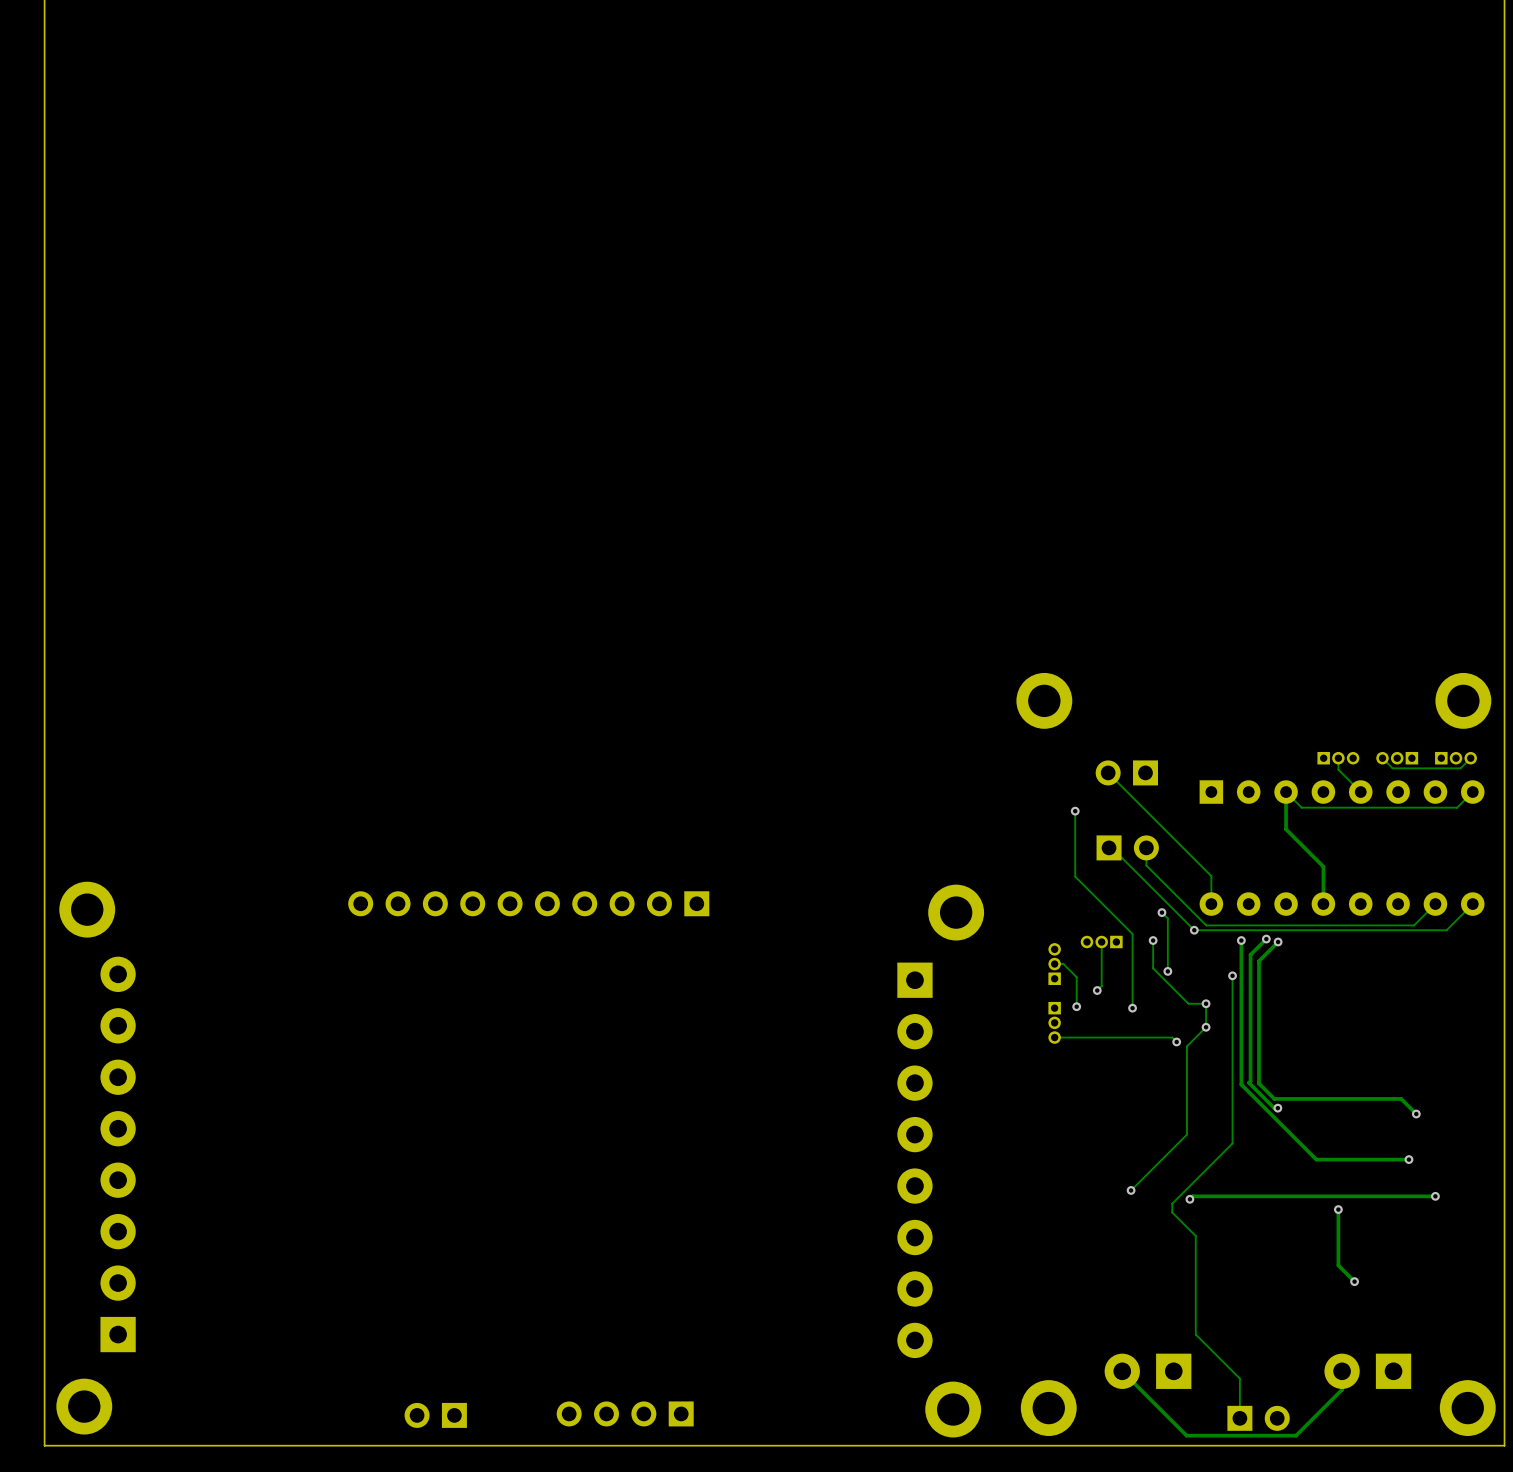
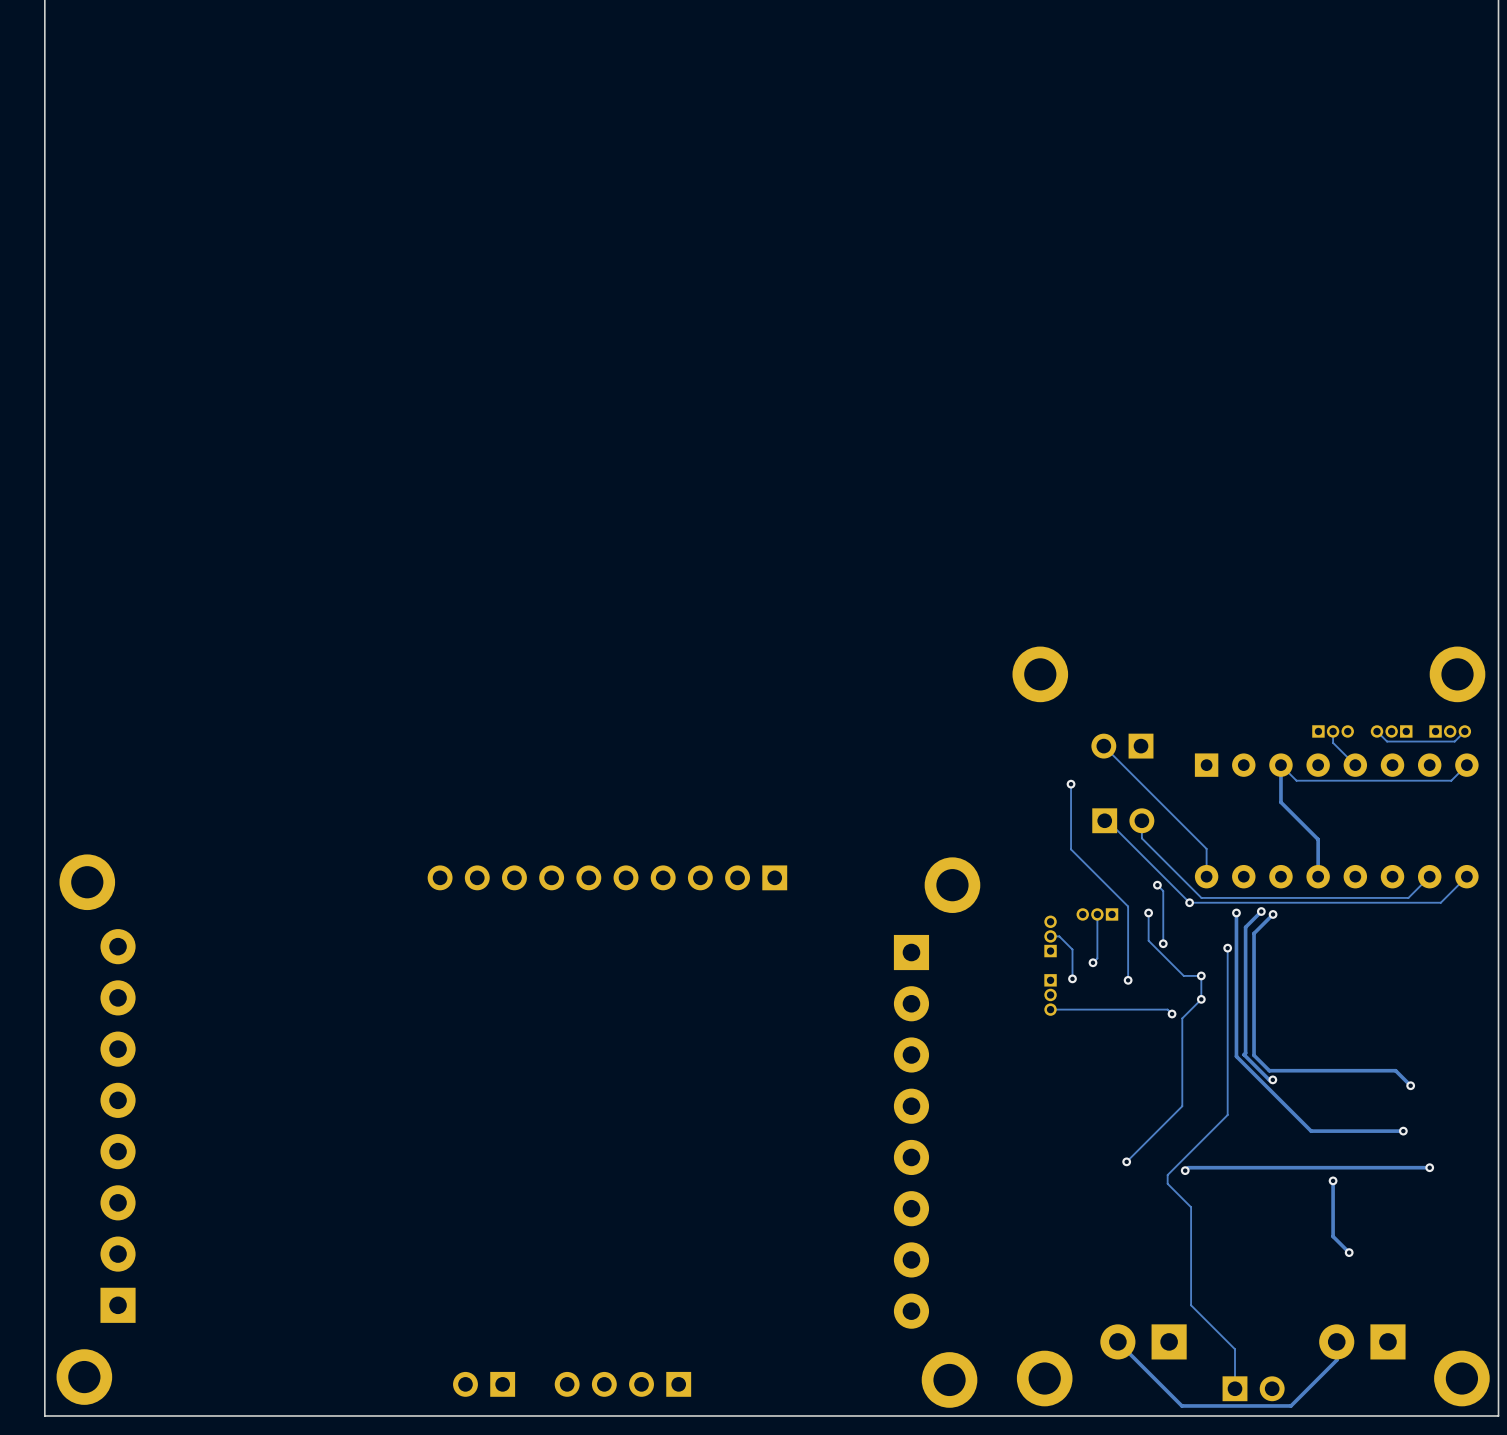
part position: (528, 903) -> (607, 877)
part position: (435, 1415) -> (484, 1384)

